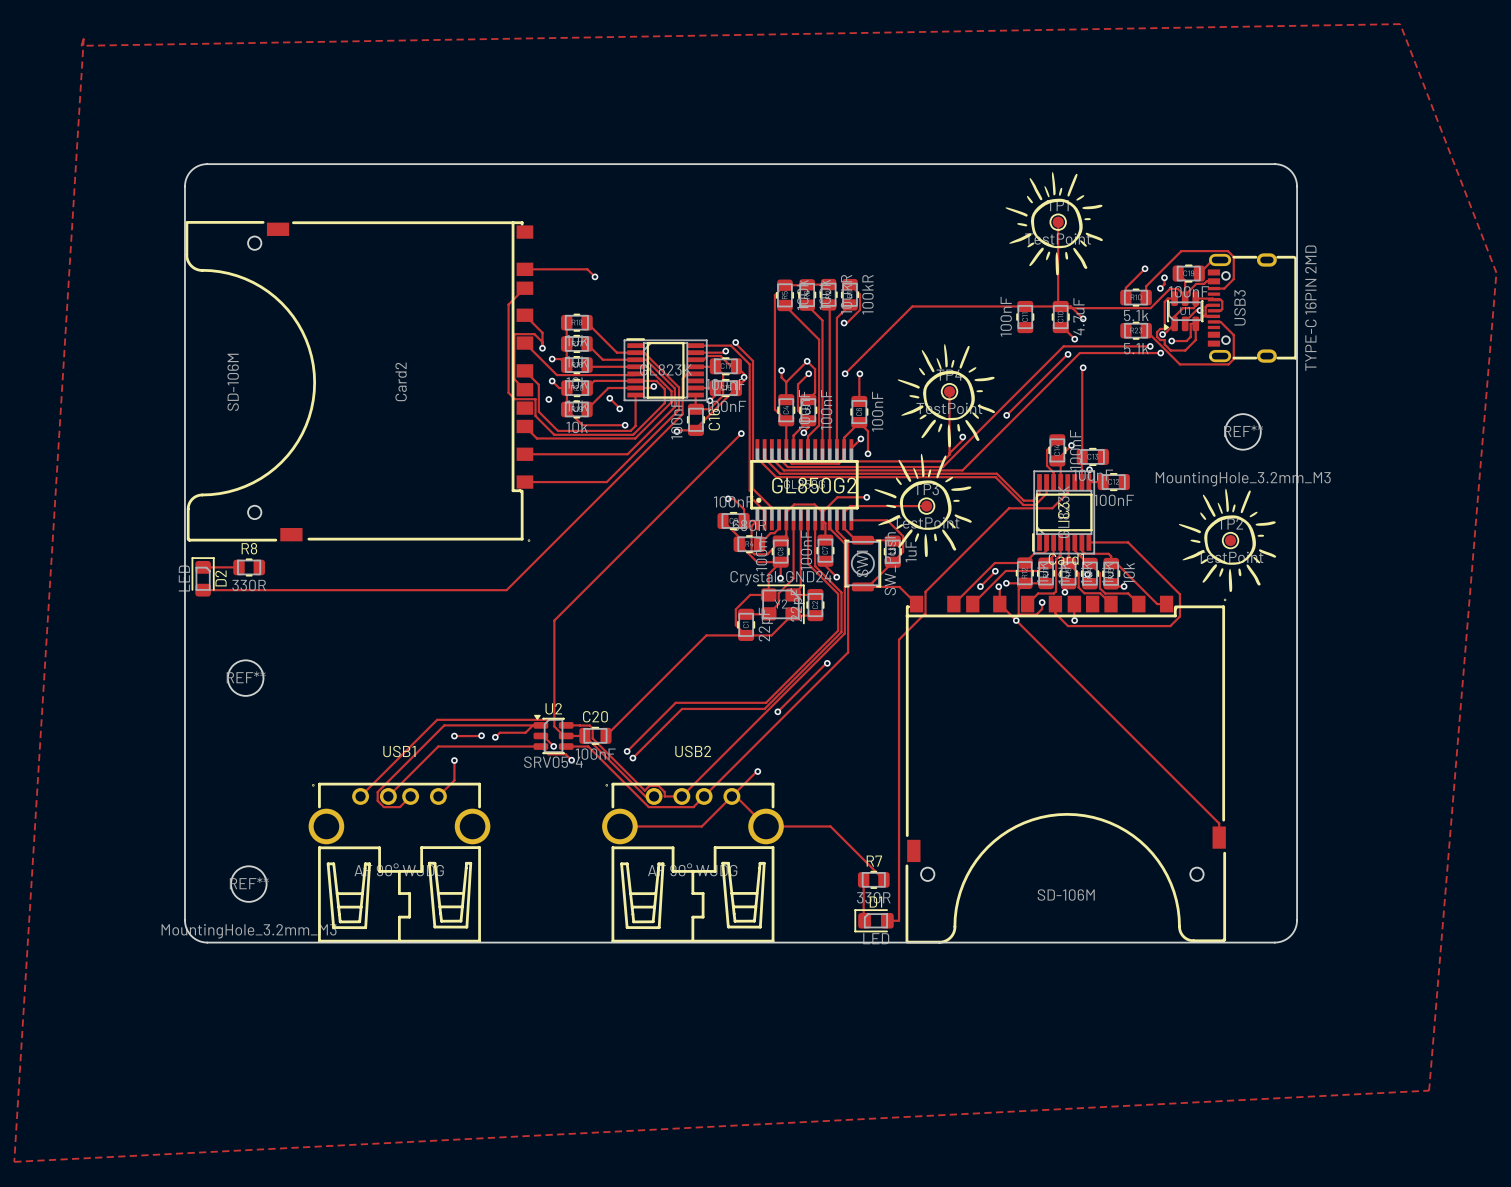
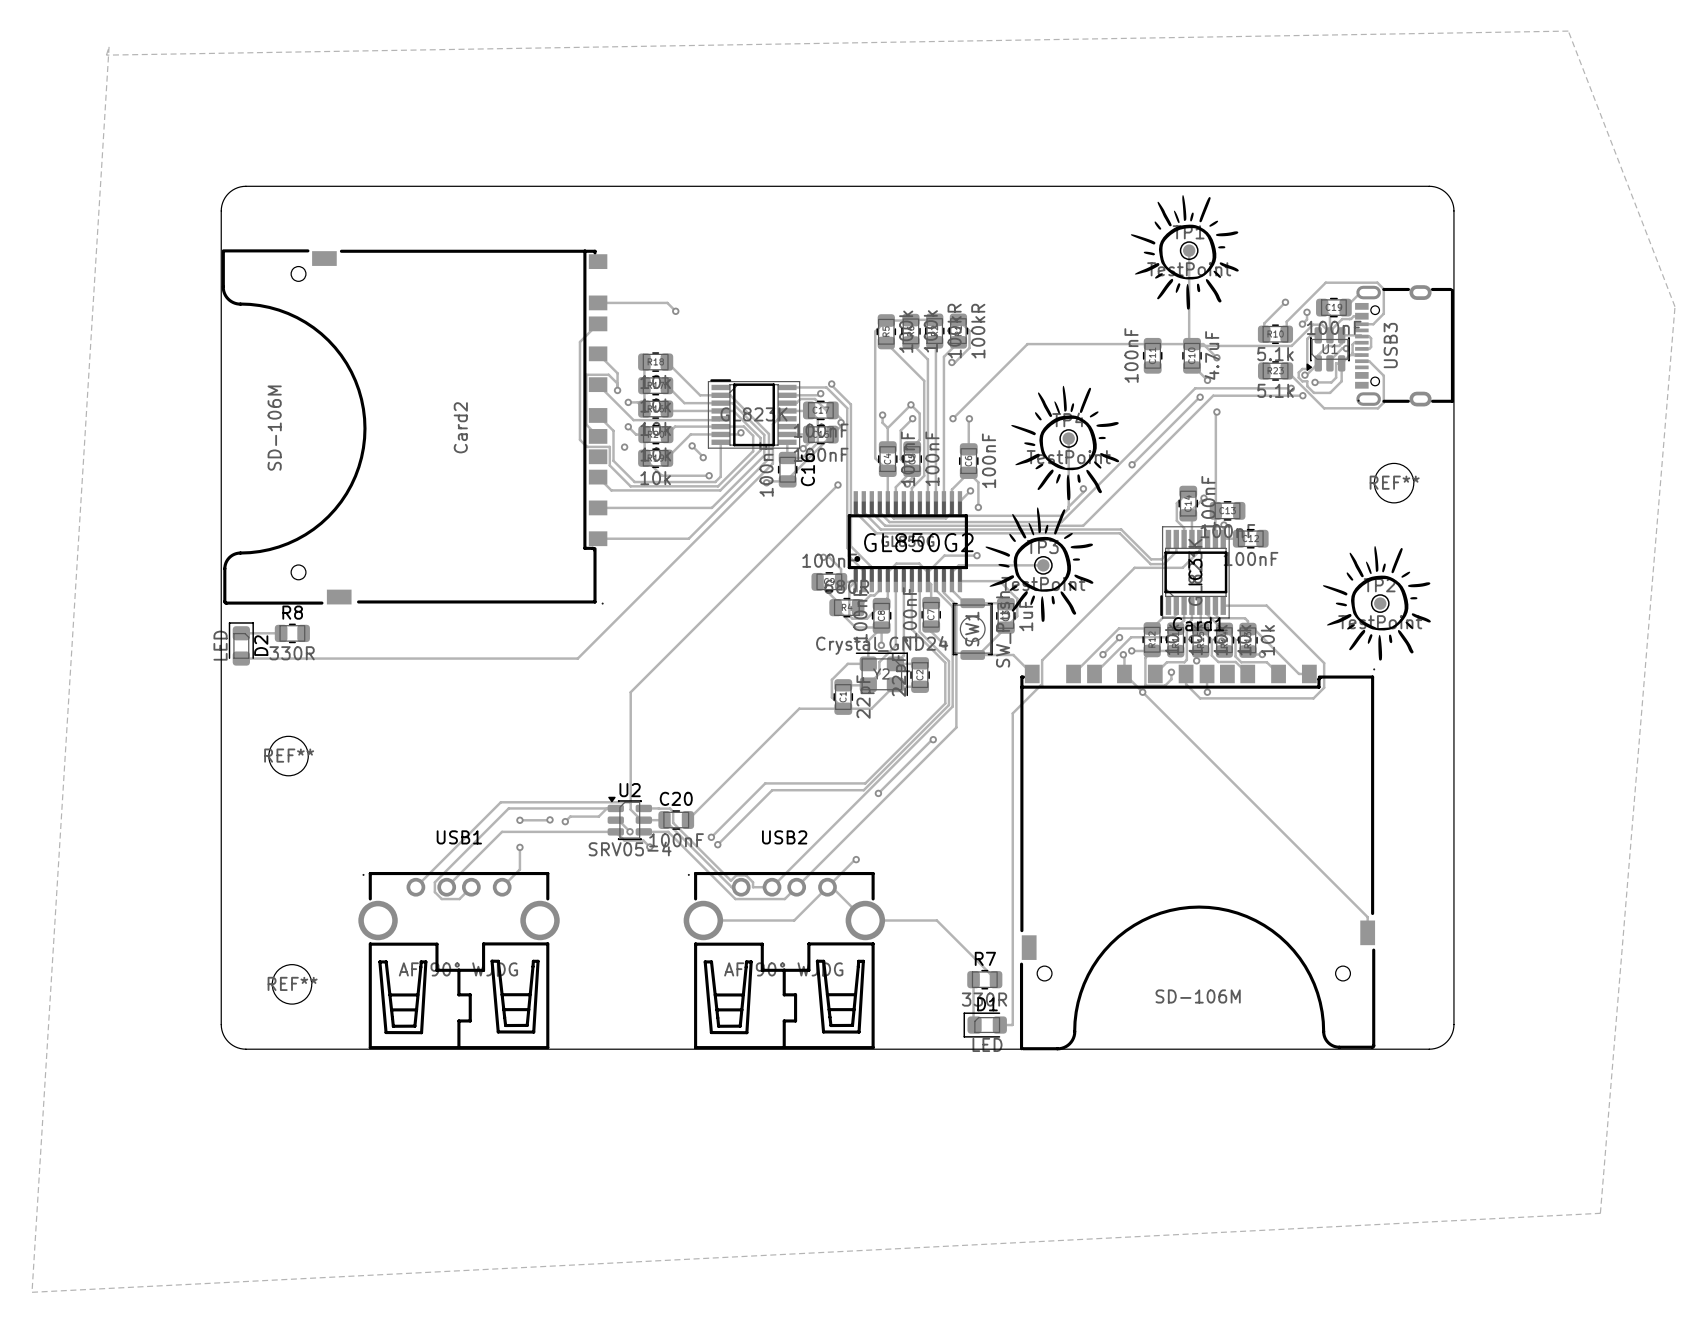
USB3 value: TYPE-C 16PIN 2MD (1310, 308) -> none
REF** value: MountingHole_3.2mm_M3 (1243, 479) -> none
REF** value: MountingHole_3.2mm_M3 (249, 931) -> none

